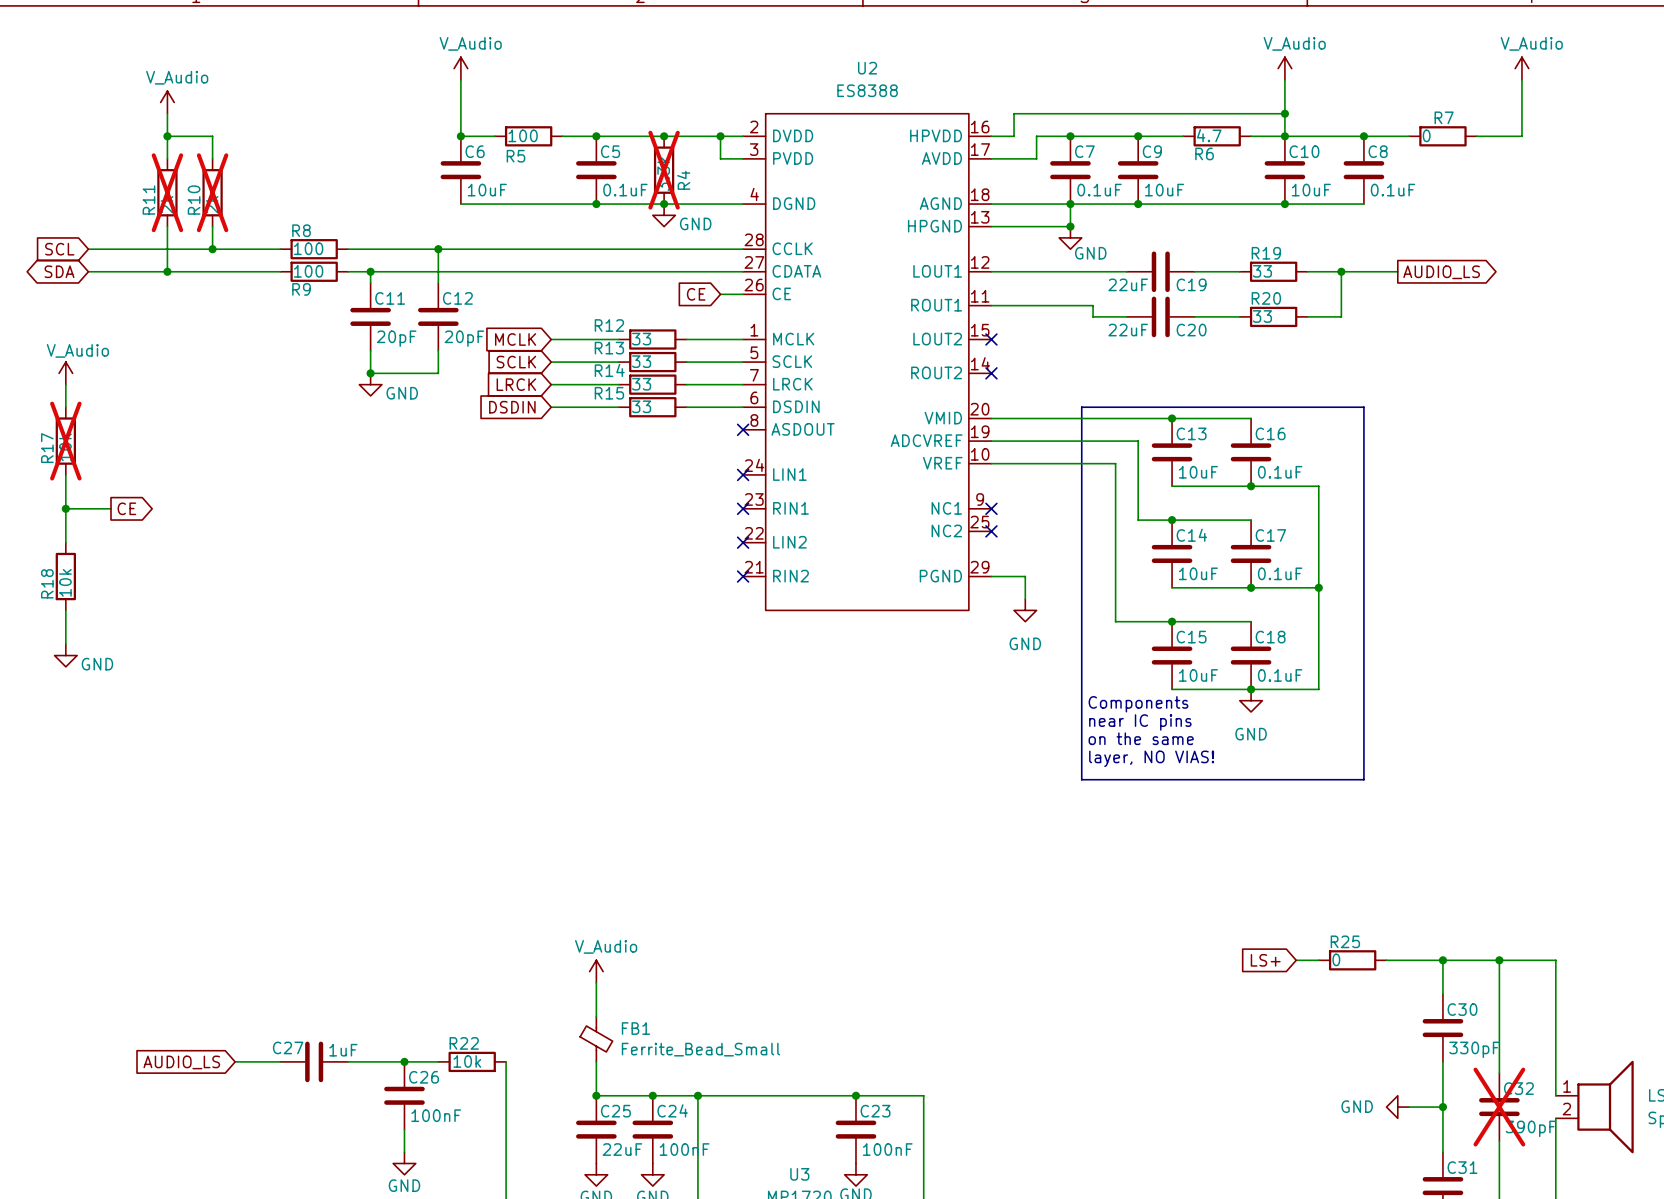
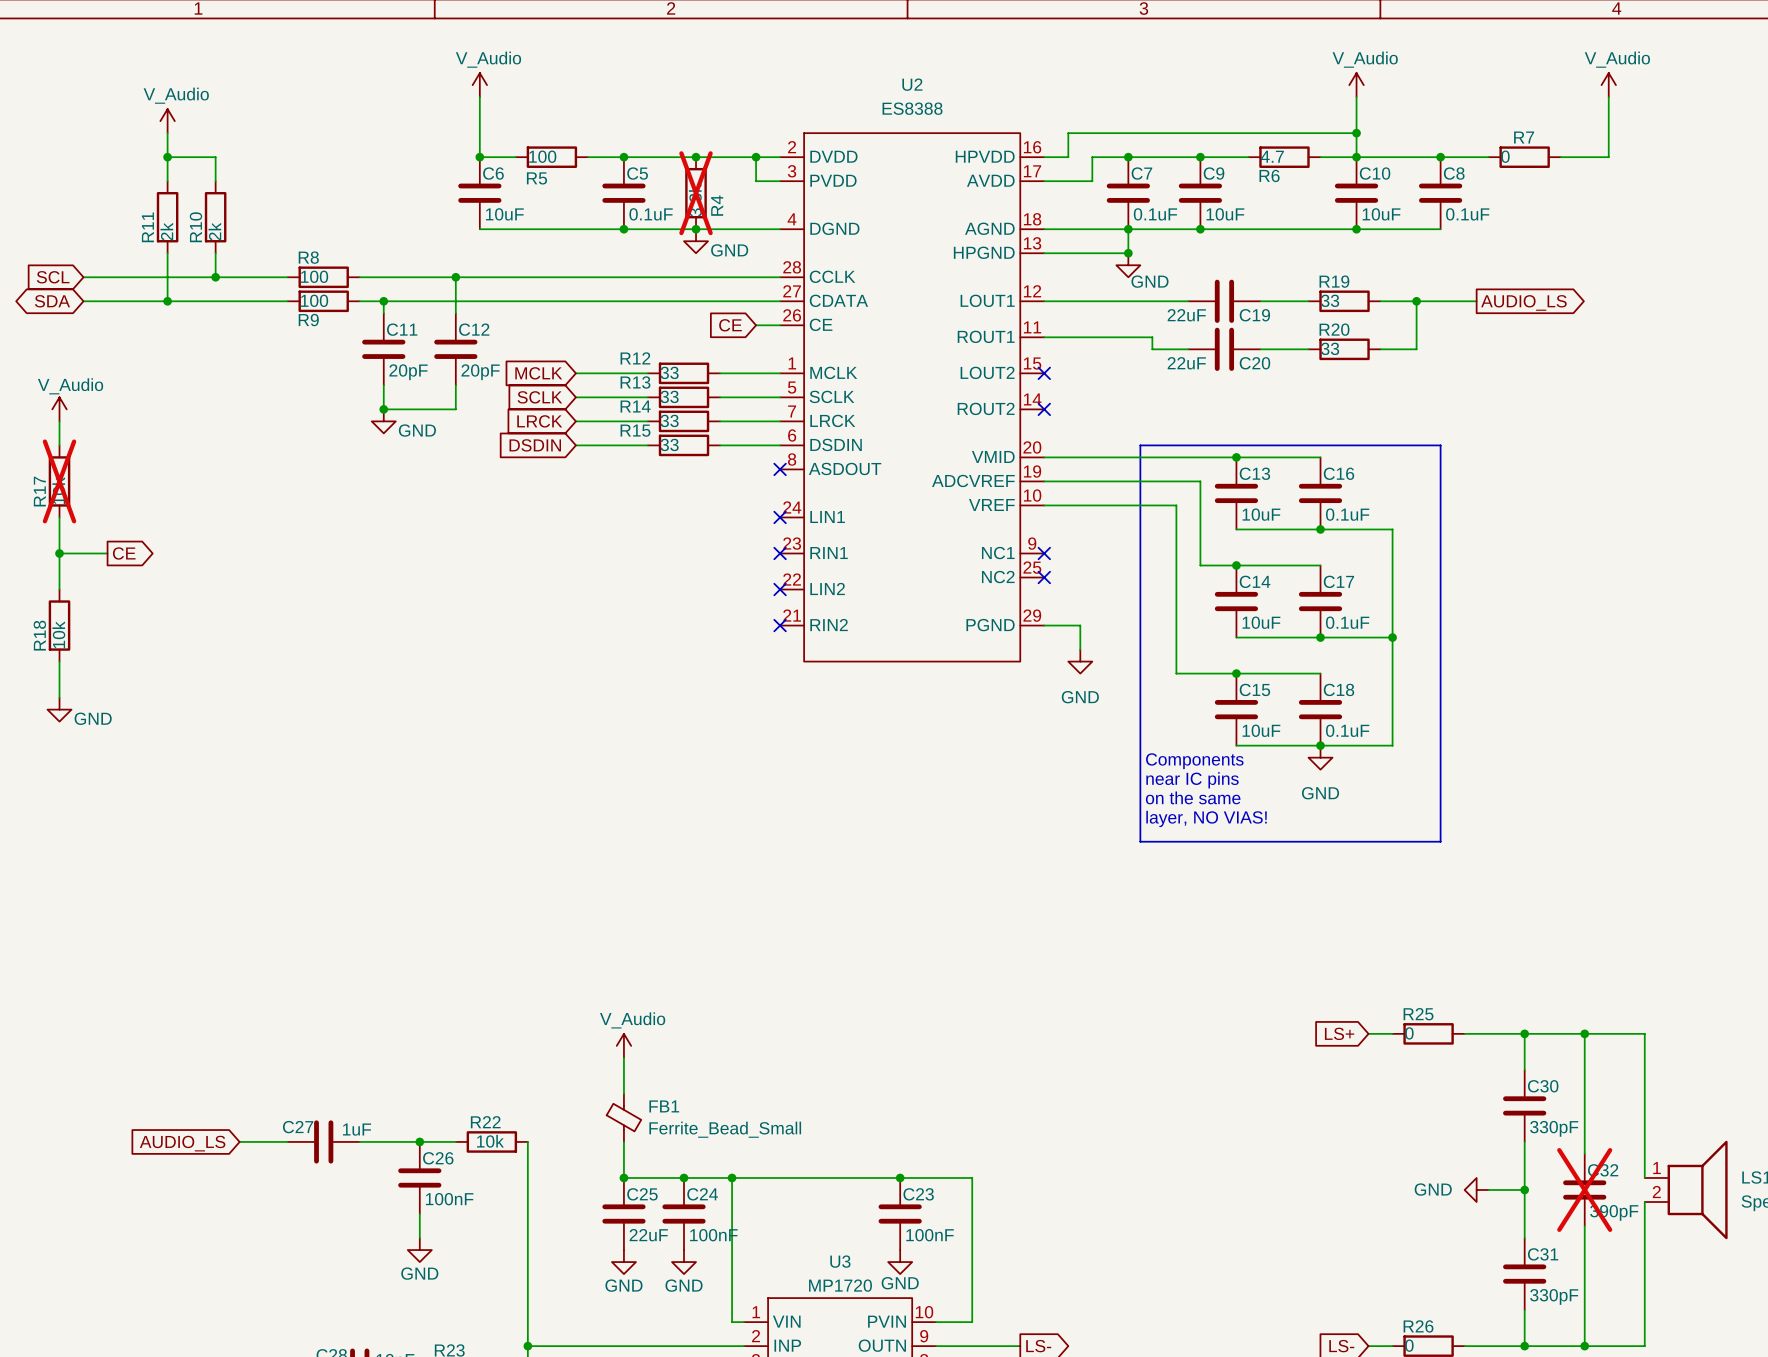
R11 do-not-place cross: (167, 192) -> none
R10 do-not-place cross: (212, 192) -> none

